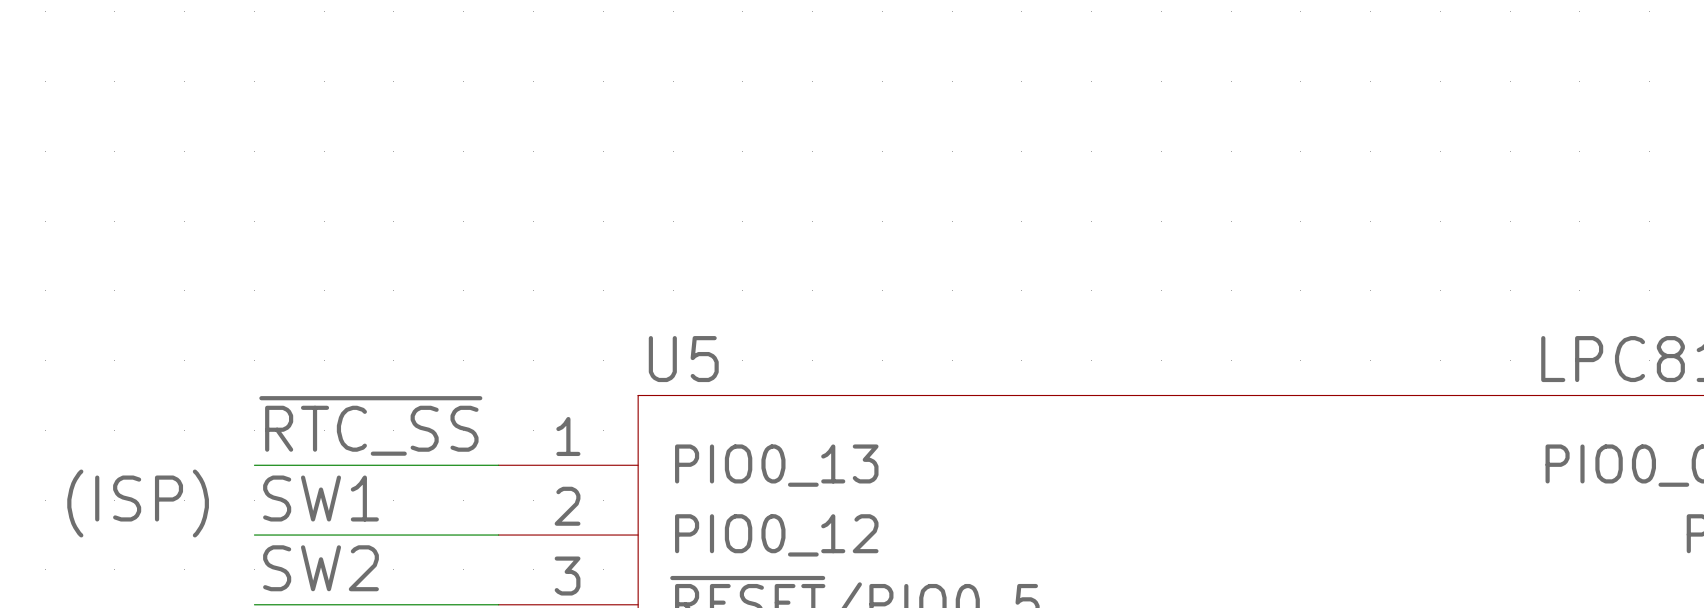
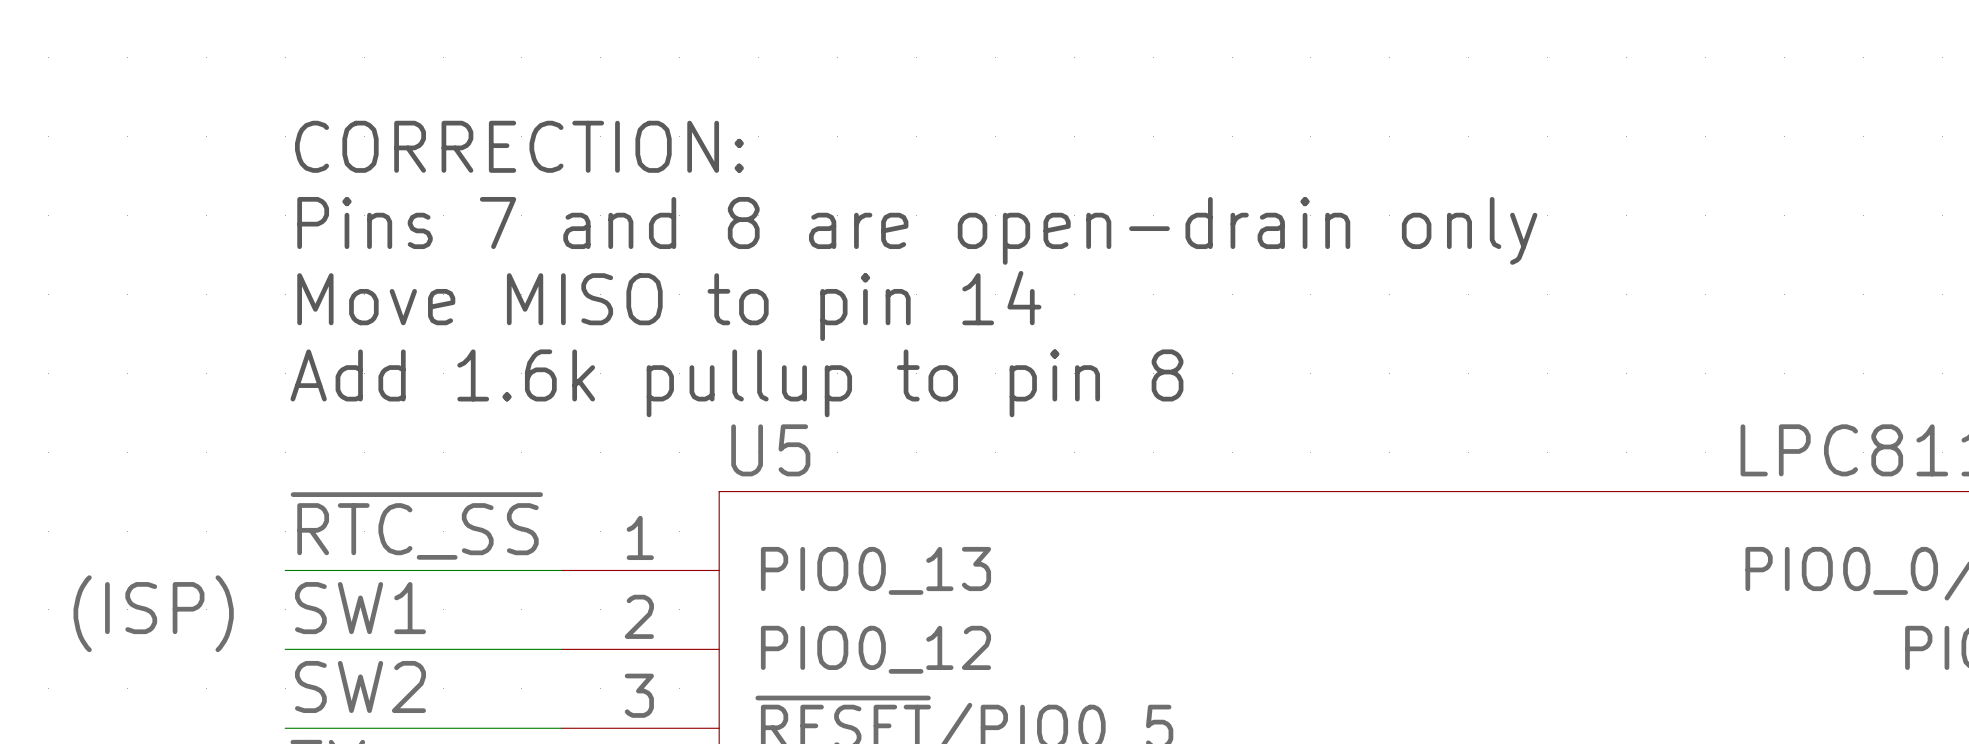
text: none -> CORRECTION: (519, 146)
text: none -> Pins 7 and 8 are open-drain only (917, 230)
text: none -> Move MISO to pin 14 (669, 305)
text: none -> Add 1.6k pullup to pin 8 (736, 383)

